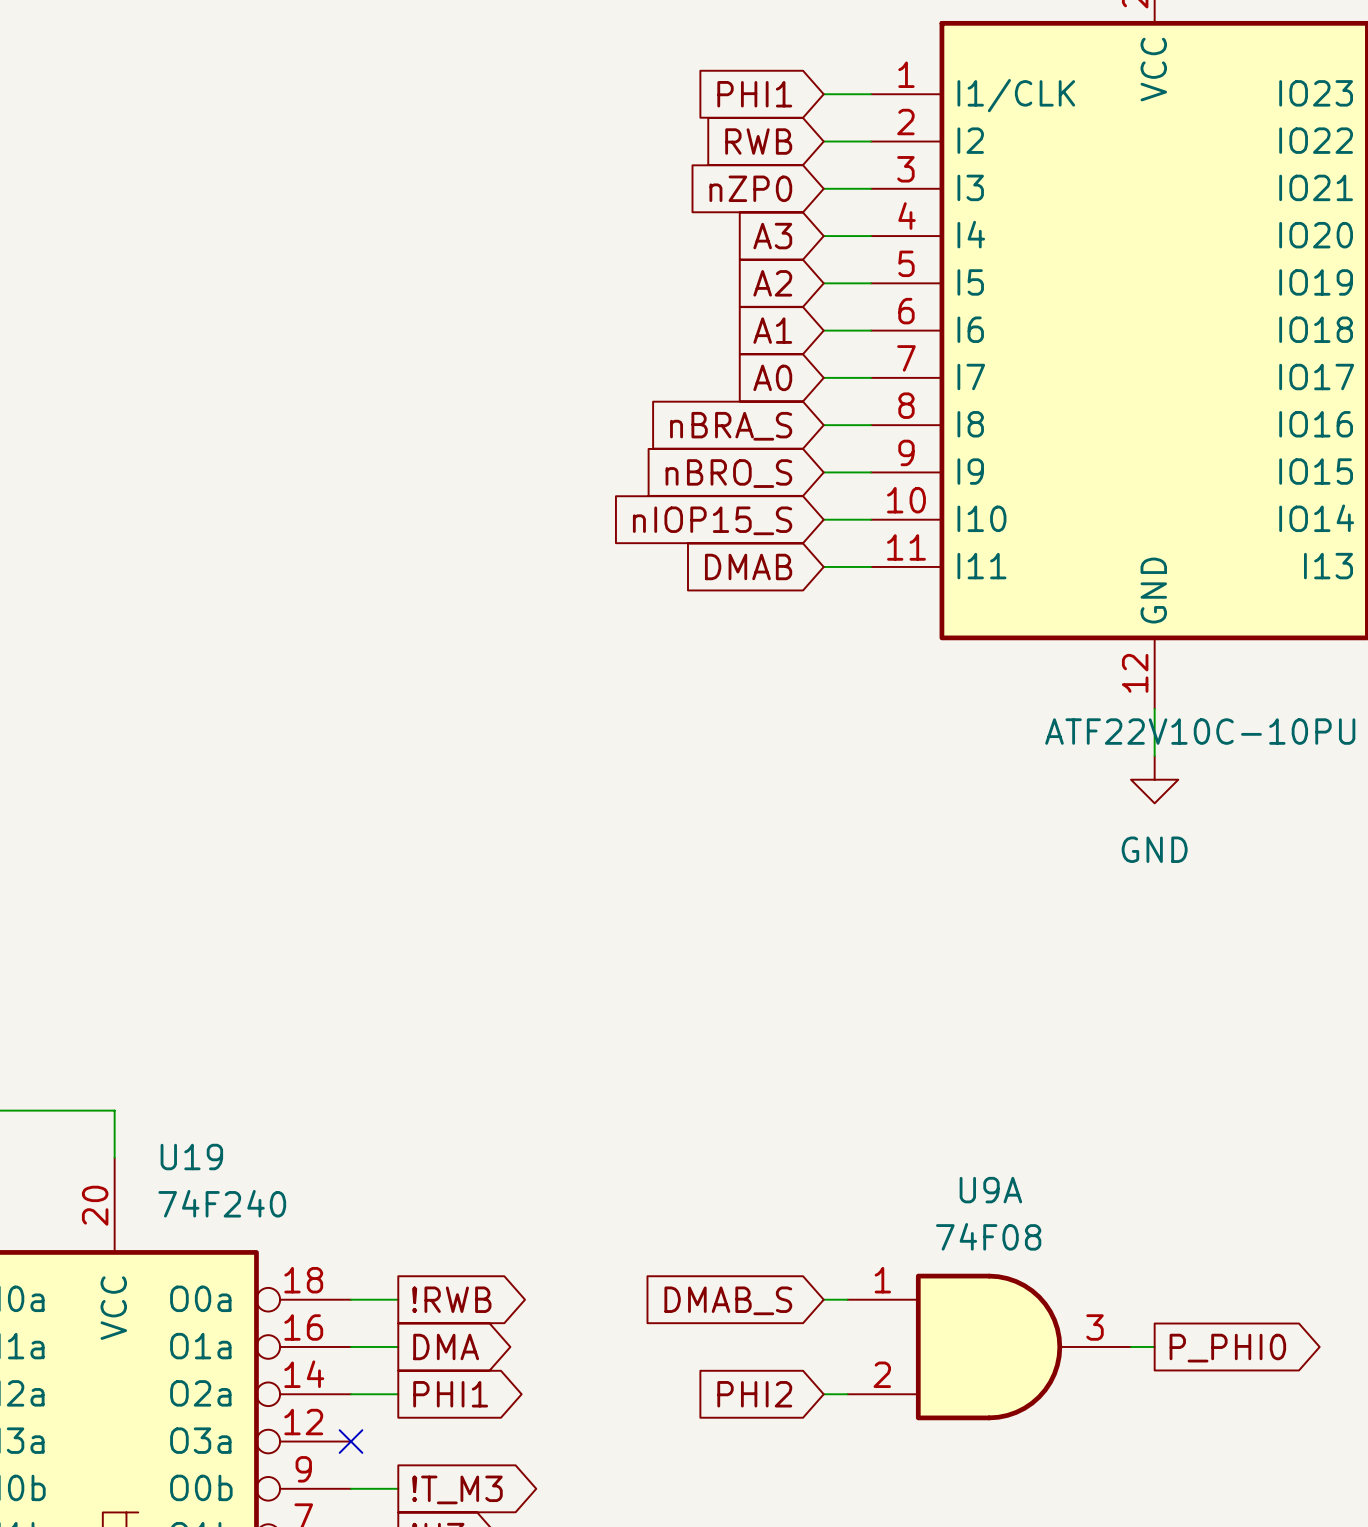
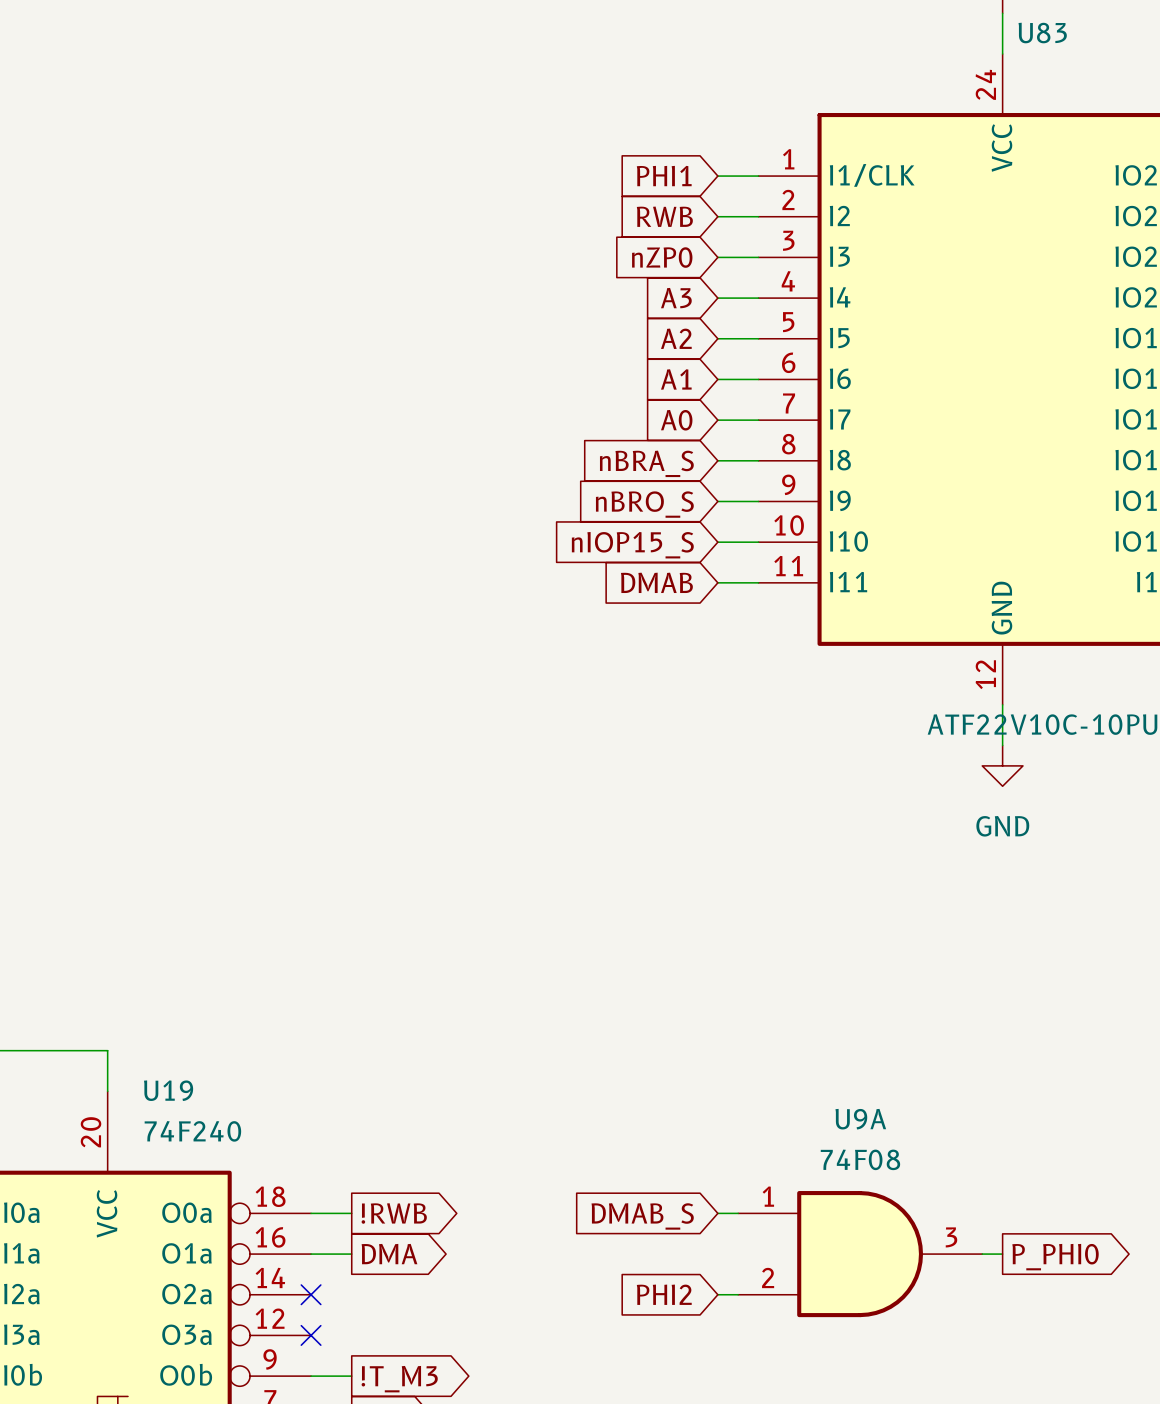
wire: (351, 1394) (398, 1394) -> none
no-connect mark: none -> (311, 1294)
global label: PHI1 (450, 1394) -> none

